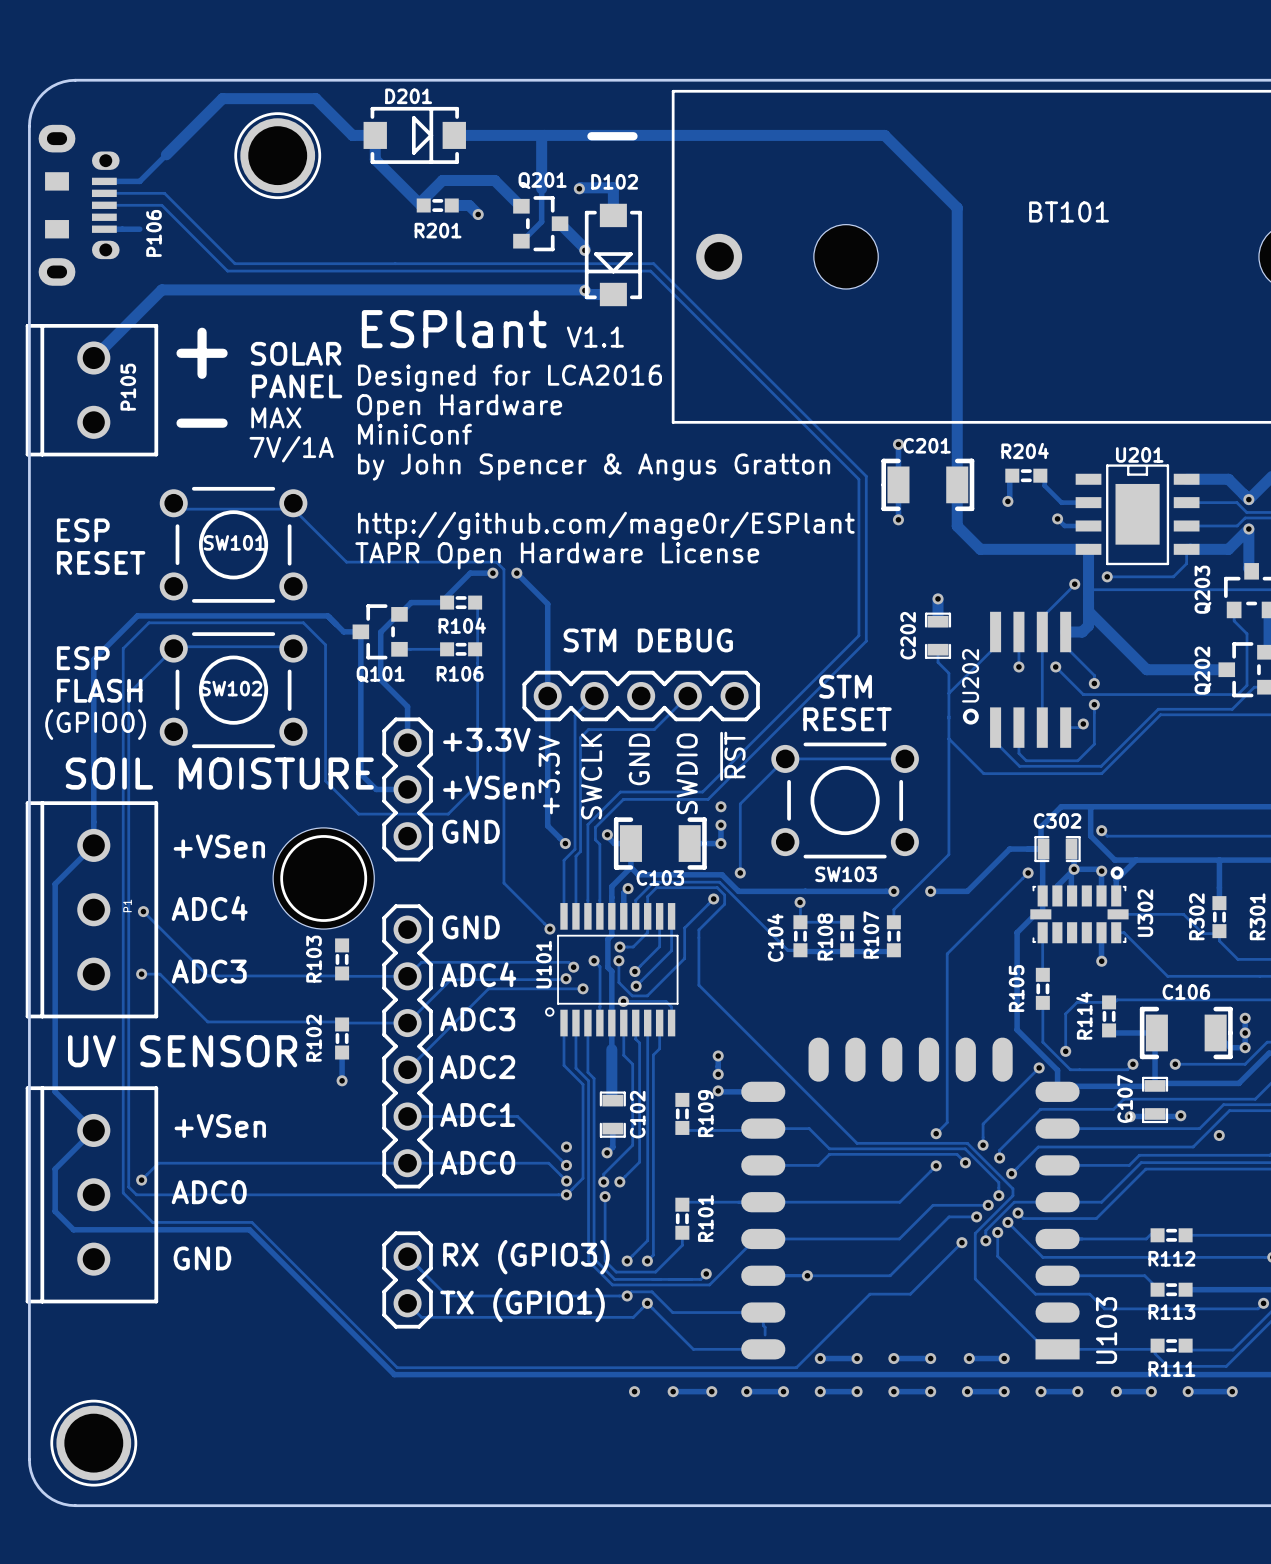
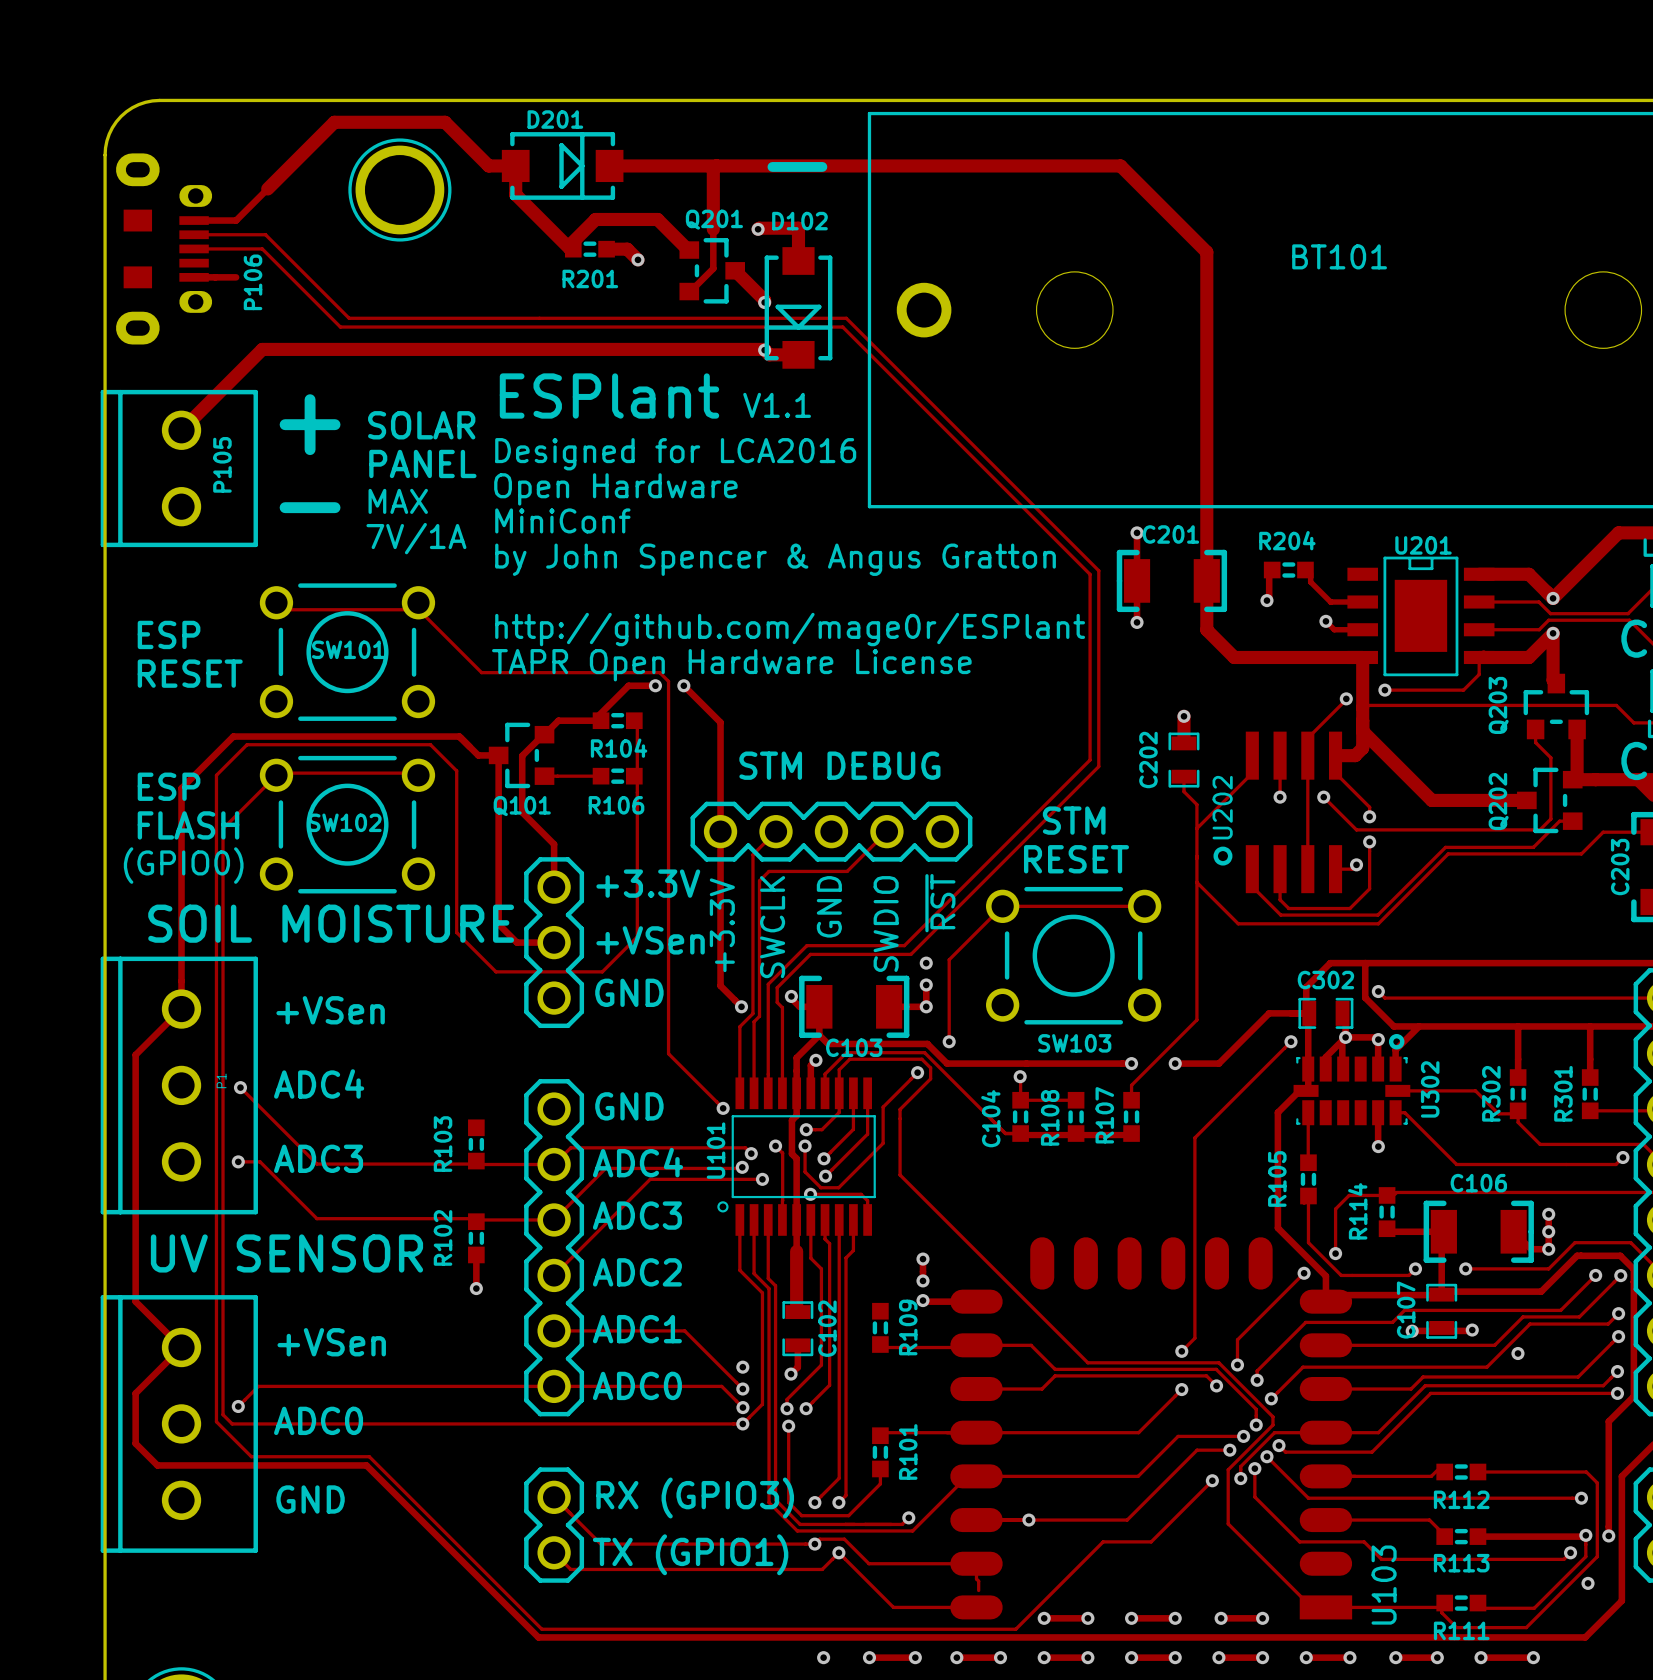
part: (323, 878) -> none

